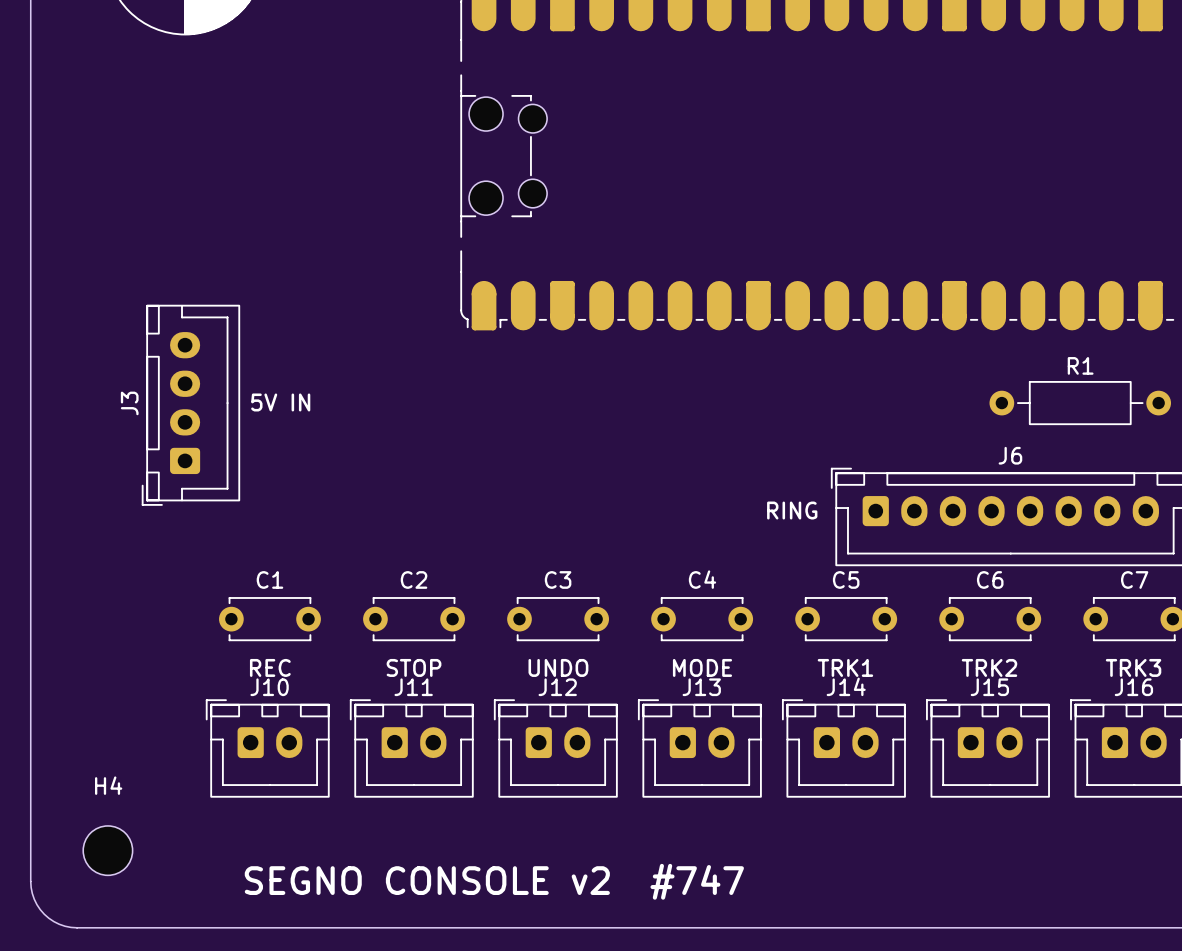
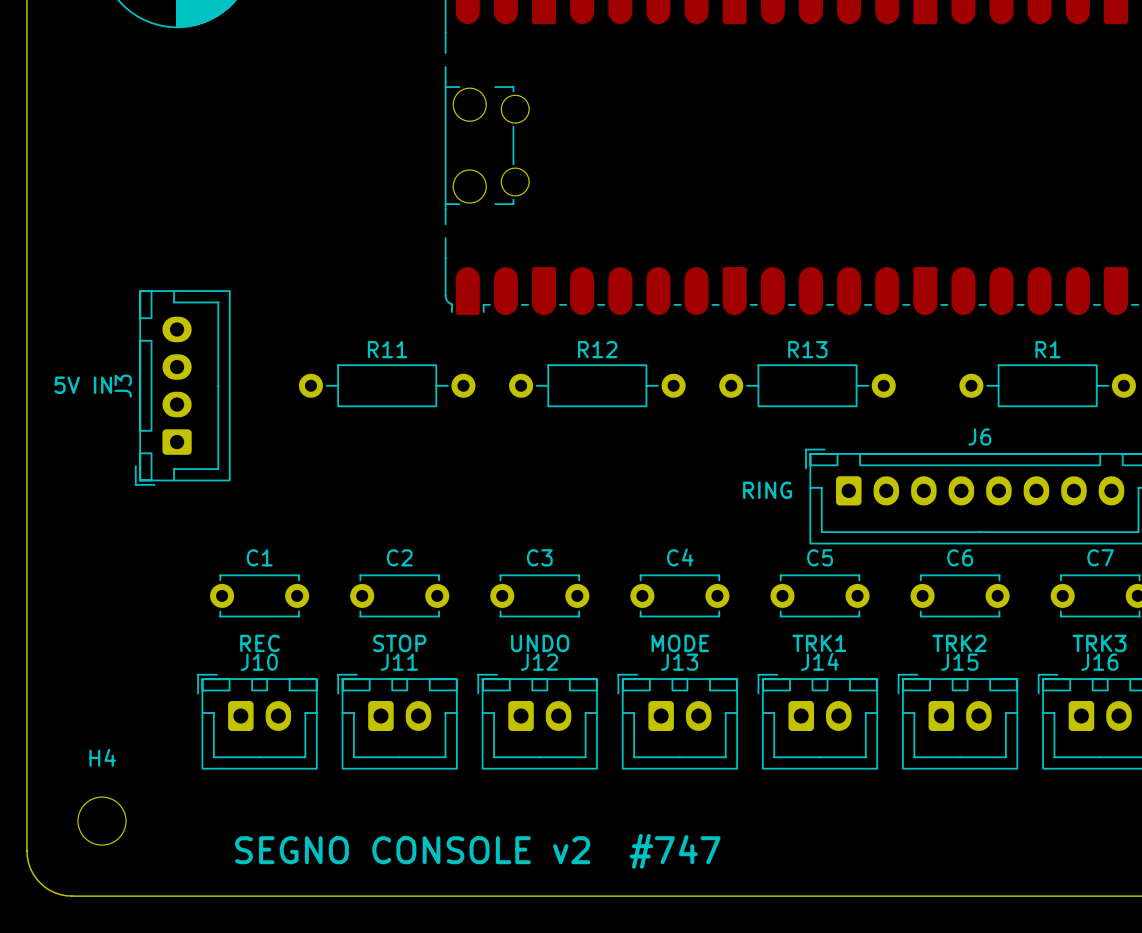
text position: 5V IN (280, 402) -> 5V IN (83, 385)
R11: none -> (387, 385)
R12: none -> (597, 385)
R13: none -> (807, 385)

